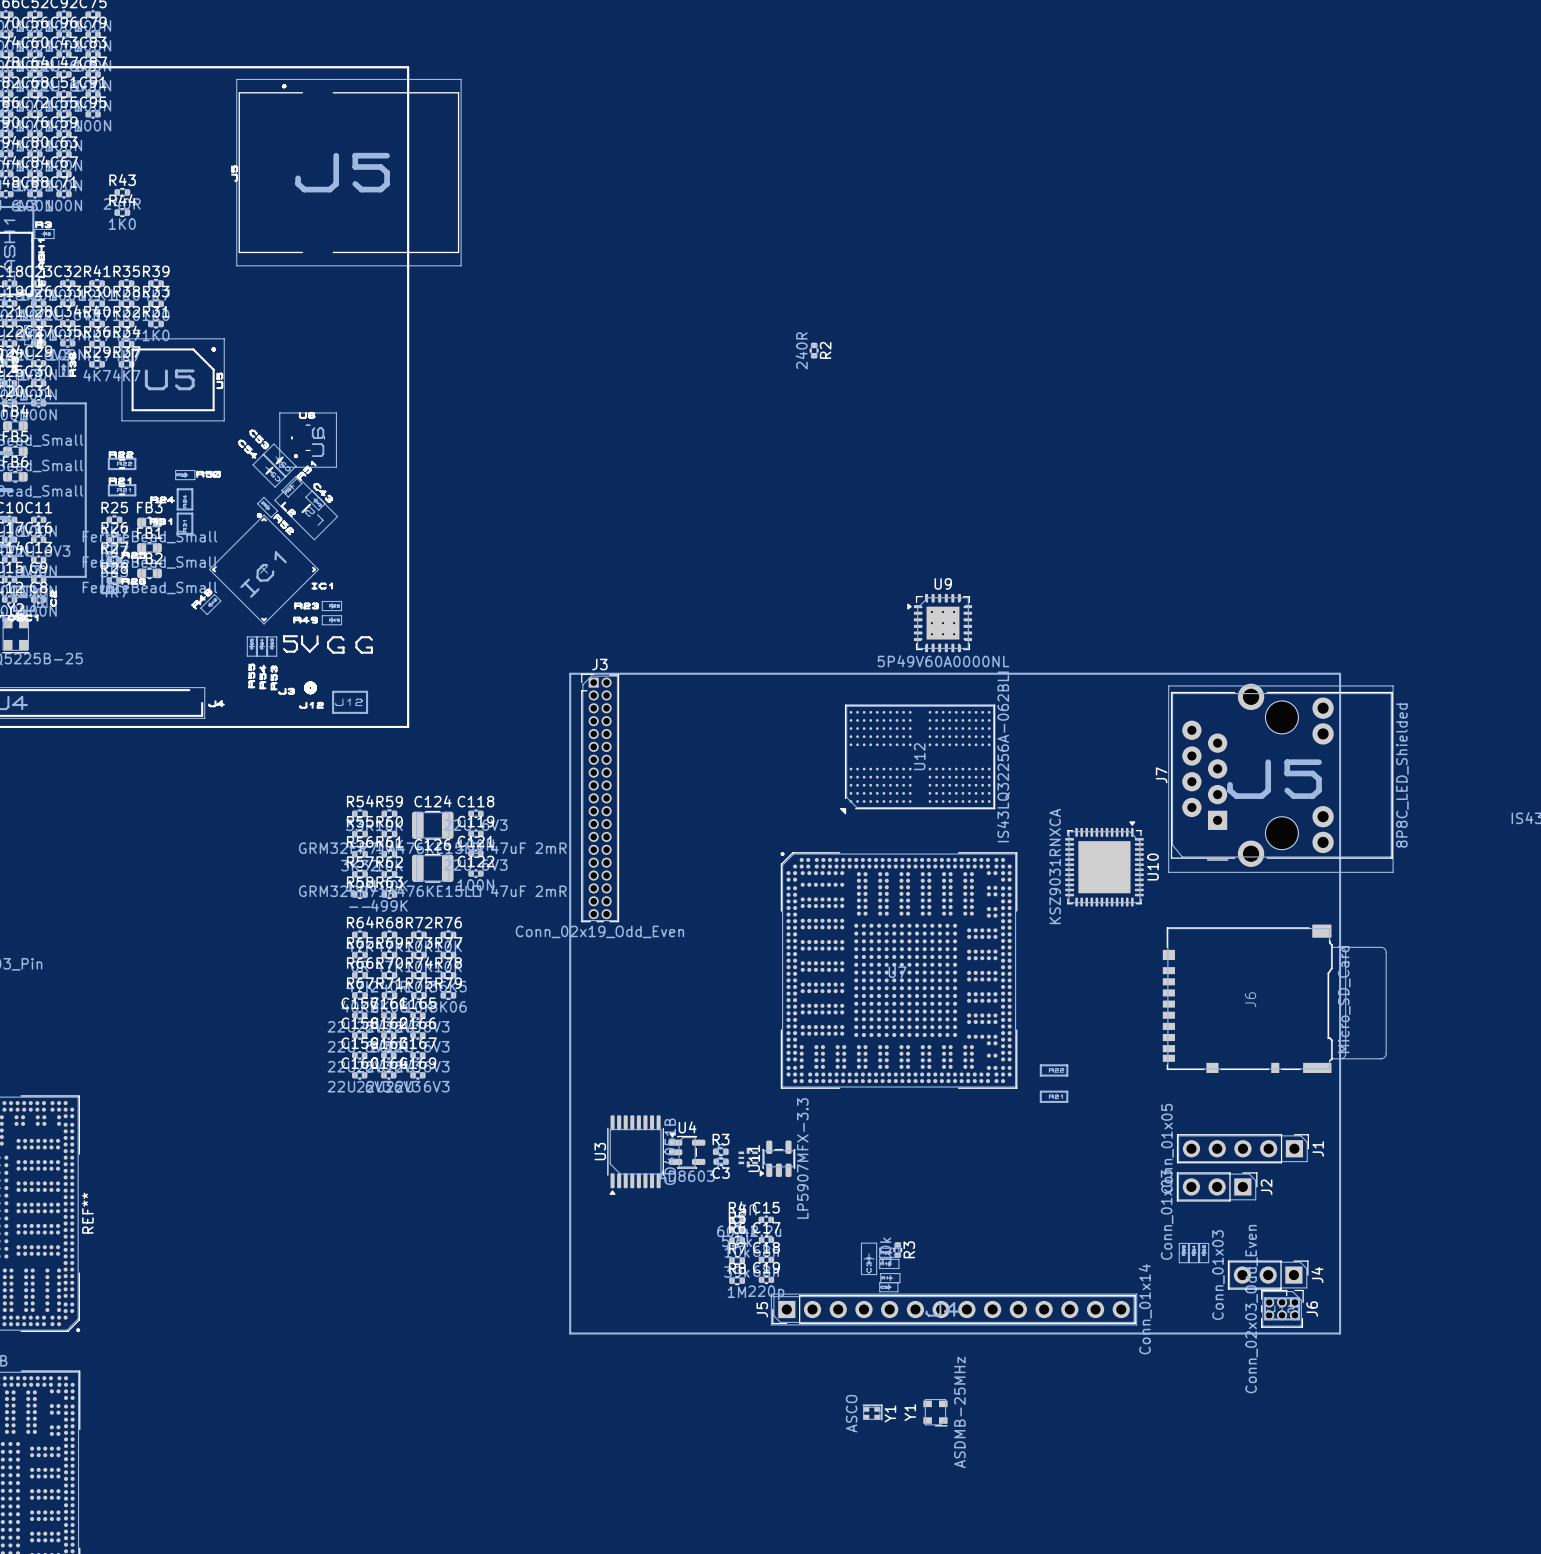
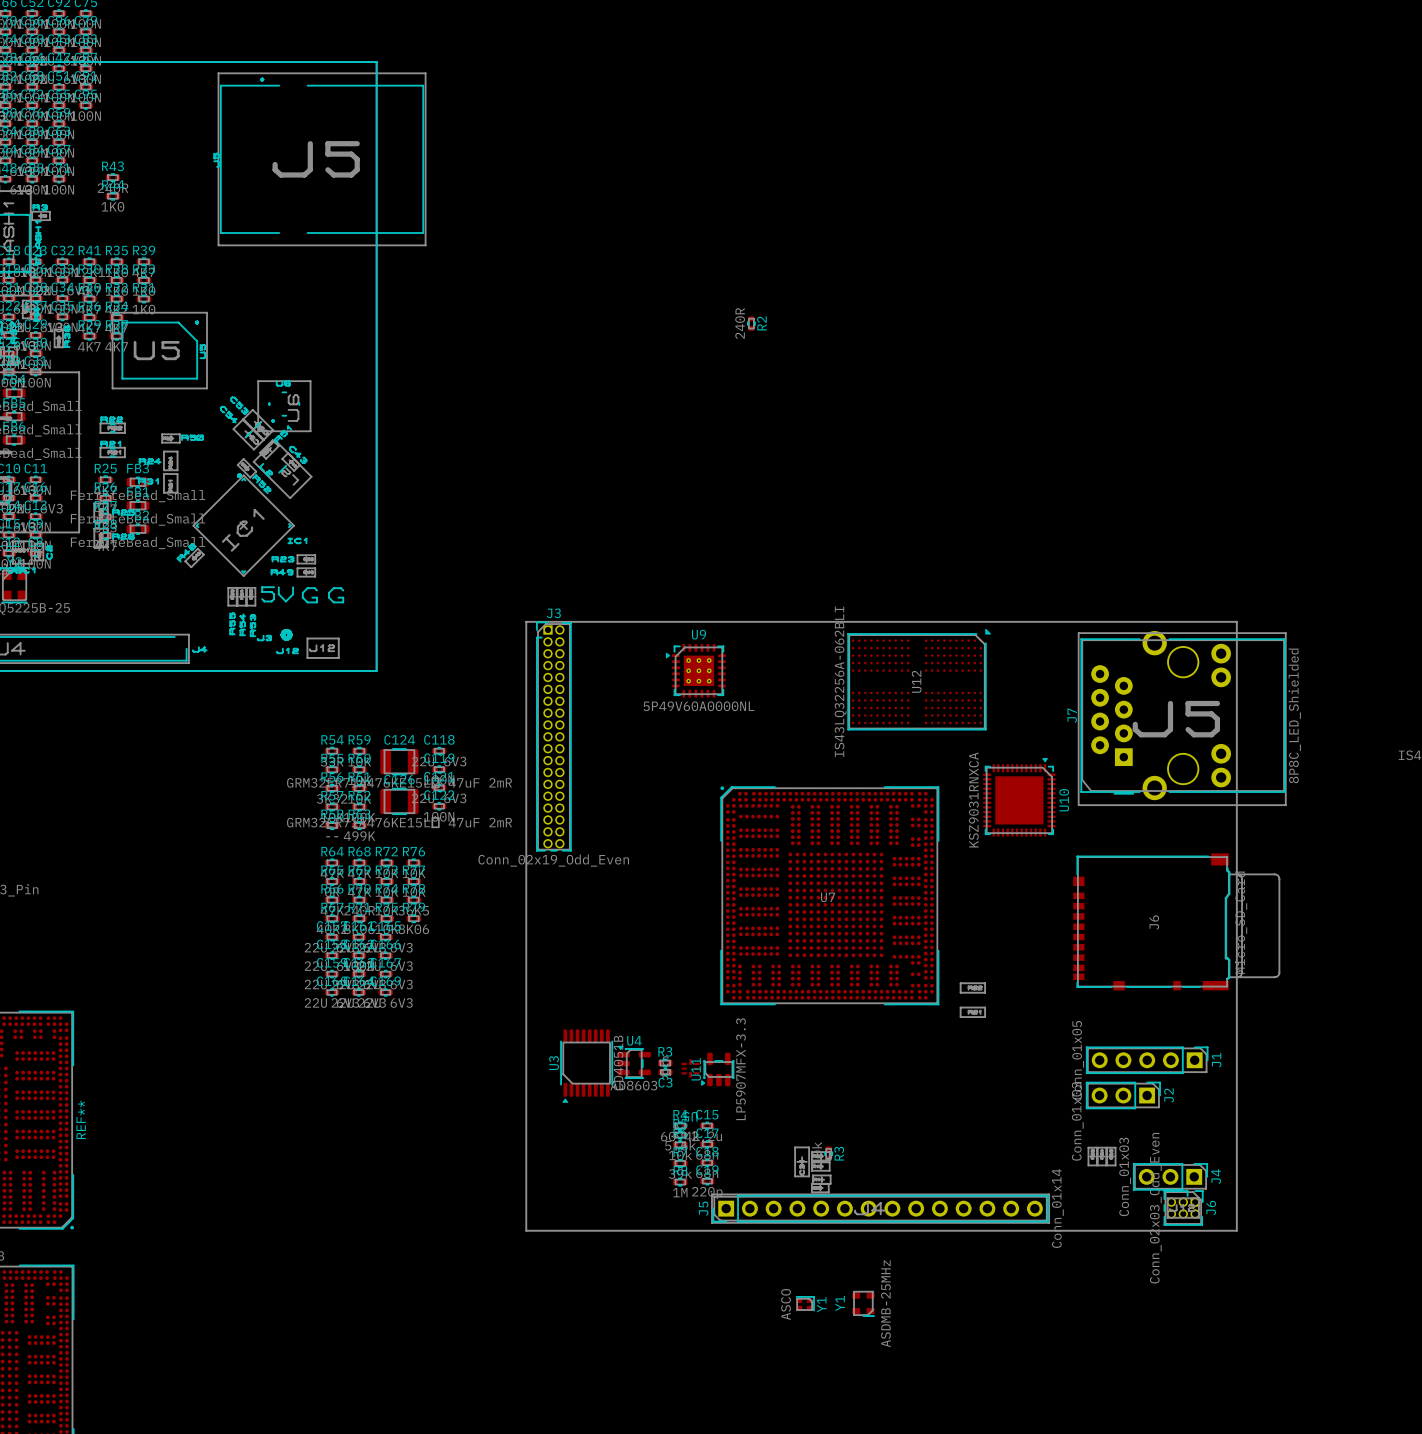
U9 position: (939, 623) -> (695, 670)
U12 rotation: 0° (917, 759) -> 180° (919, 679)

